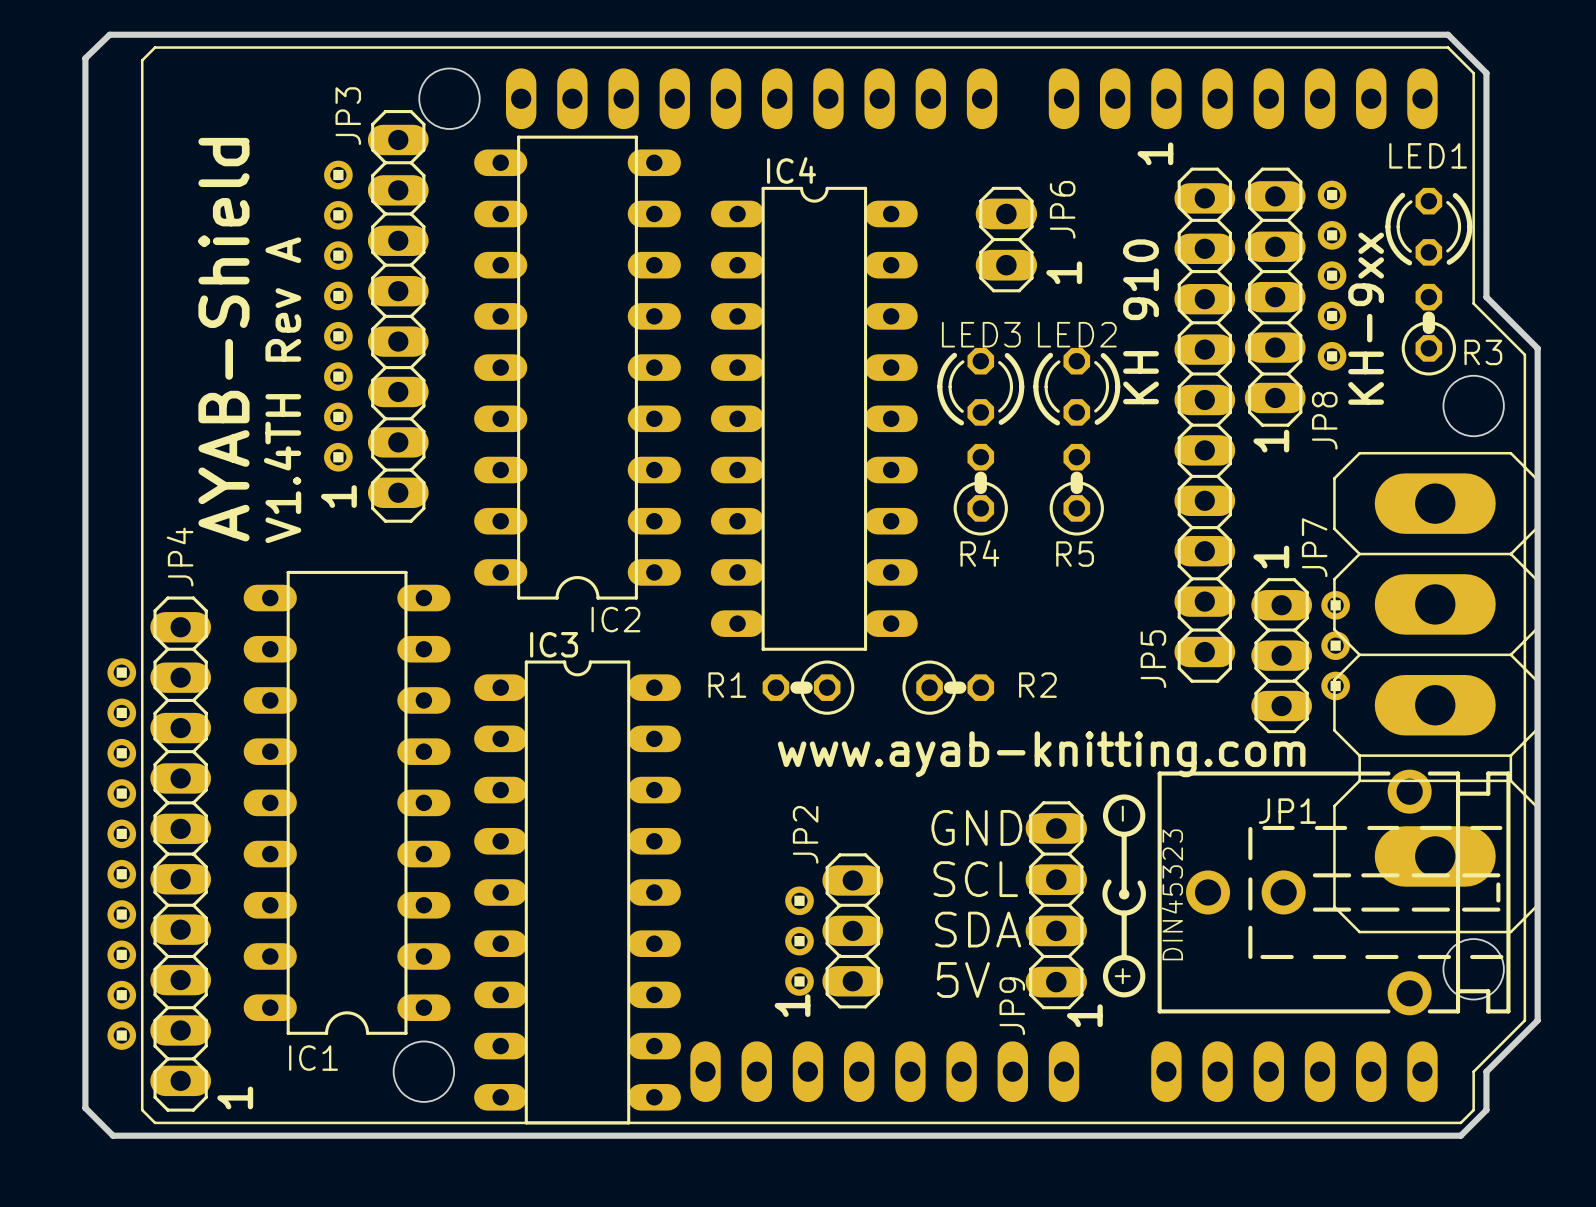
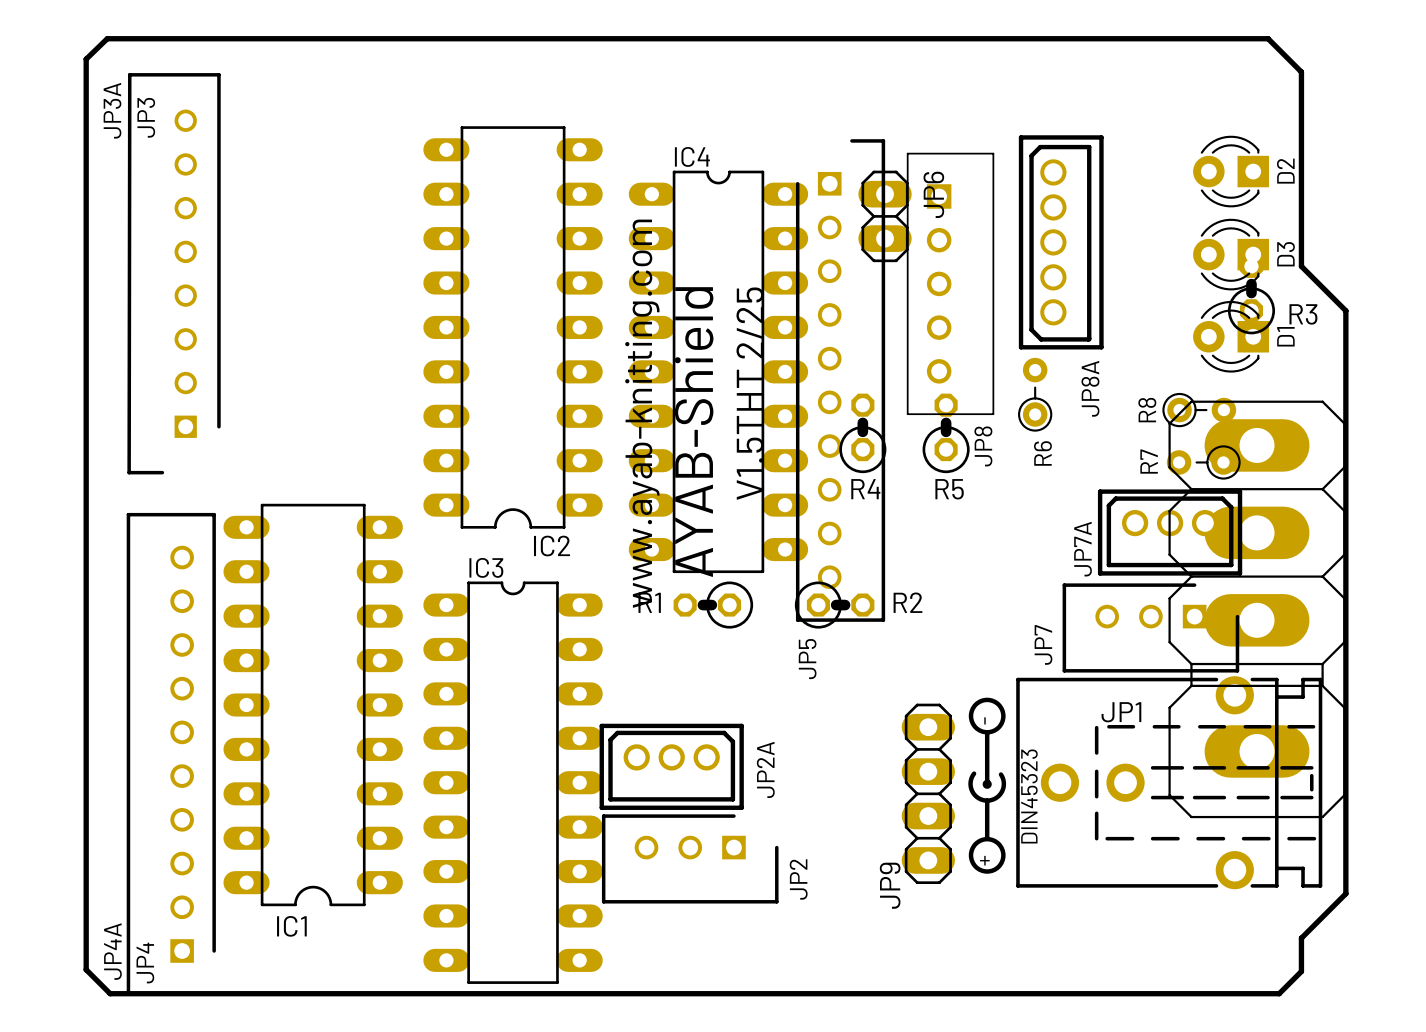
text: none -> JP3A (112, 110)
text: none -> JP3 (146, 117)
text: 1 (1155, 153) -> none
D2: none -> (1231, 171)
LED1: (1428, 226) -> none
part: none -> (1061, 242)
text: 1 (1064, 272) -> none
part: (1332, 275) -> none
D3: none -> (1231, 254)
JP8: (1275, 297) -> none
part: none -> (174, 273)
part: (338, 316) -> none
JP3: (398, 316) -> none
part: none -> (950, 283)
text: KH-9xx (1366, 318) -> none
text: KH 910 (1141, 321) -> none
text: AYAB-Shield (223, 339) -> none
D1: none -> (1231, 336)
LED3: (980, 386) -> none
LED2: (1076, 386) -> none
text: V1.4TH Rev A (282, 390) -> none
text: none -> V1.5THT 2/25 (749, 393)
JP5: (1204, 425) -> none
part: none -> (840, 380)
text: none -> JP8A (1090, 388)
text: 1 (1271, 441) -> none
R6: none -> (1035, 394)
text: none -> AYAB-Shield (694, 432)
R8: none -> (1199, 410)
text: 1 (338, 496) -> none
text: none -> JP8 (983, 446)
text: none -> www.ayab-knitting.com (642, 413)
R7: none -> (1203, 462)
text: 1 (1271, 557) -> none
part: (833, 585) -> none
part: none -> (1170, 532)
text: none -> JP7A (1083, 549)
part: (1335, 645) -> none
JP7: (1281, 655) -> none
part: none -> (1150, 627)
text: none -> JP7 (1043, 644)
text: none -> JP5 (807, 659)
text: www.ayab-knitting.com (1041, 754) -> none
text: GND (976, 827) -> none
part: (121, 854) -> none
JP4: (180, 854) -> none
part: none -> (171, 754)
part: none -> (671, 766)
text: none -> JP2A (765, 769)
text: SCL (975, 879) -> none
text: SDA (978, 929) -> none
JP2: (852, 930) -> none
part: (799, 941) -> none
part: none -> (690, 858)
text: 5V (963, 980) -> none
text: none -> JP2 (798, 879)
text: 1 (792, 1005) -> none
text: 1 (1084, 1015) -> none
text: none -> JP4A (112, 951)
text: 1 (235, 1097) -> none
text: none -> JP4 (145, 963)

